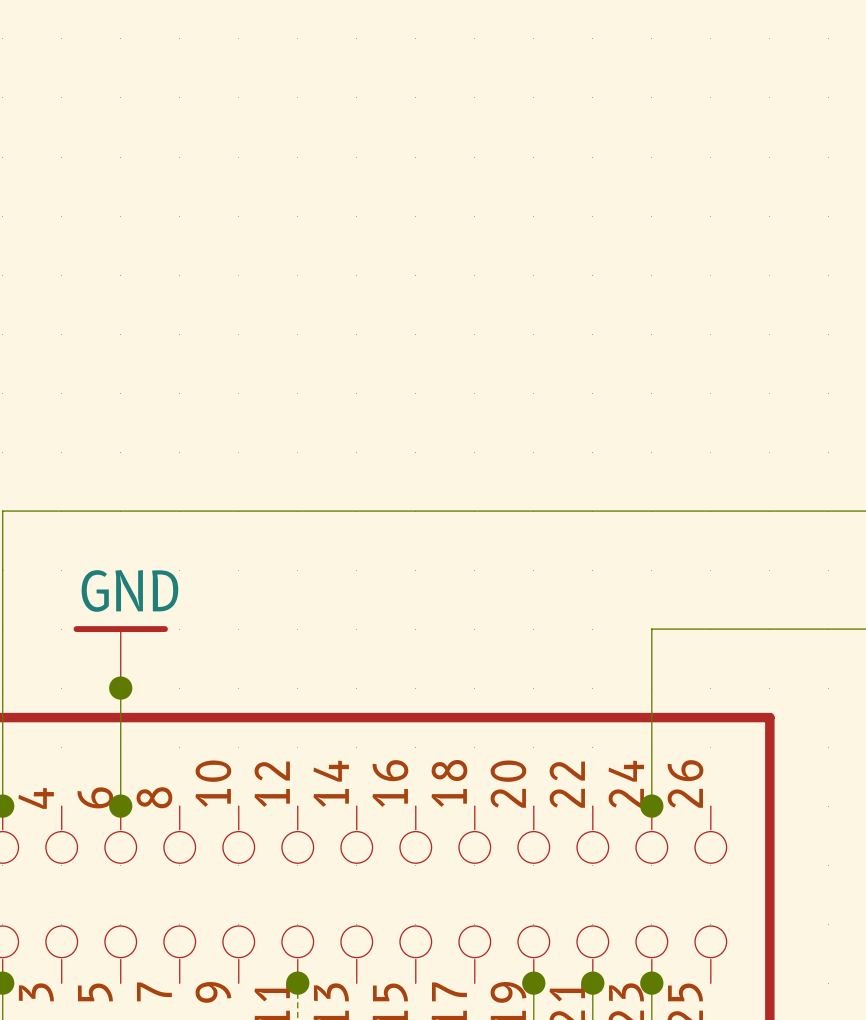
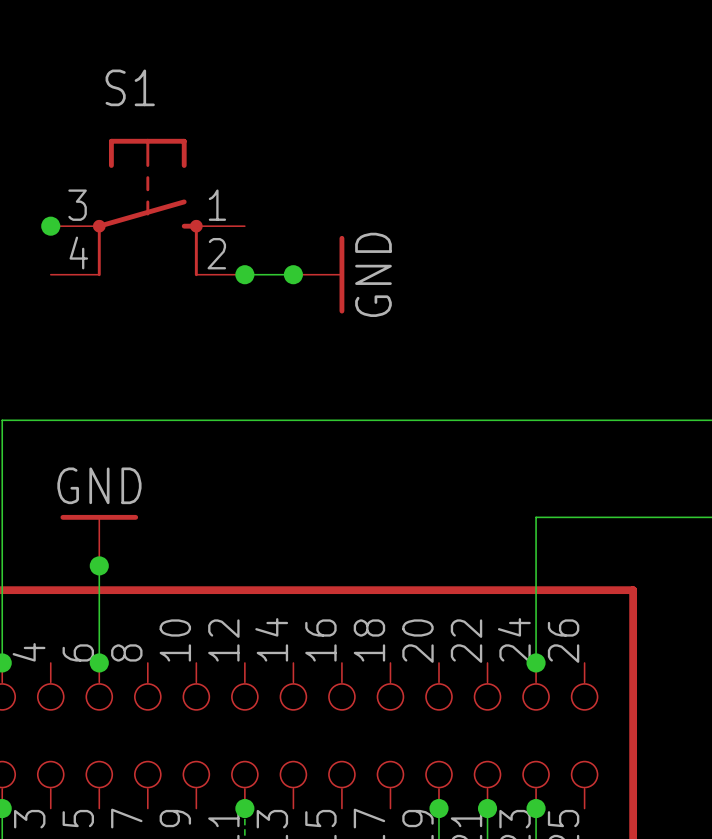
S1: none -> (147, 207)
junction: none -> (50, 226)
wire: none -> (244, 274) (293, 274)
junction: none -> (244, 274)
junction: none -> (293, 274)
power symbol: none -> GND (318, 274)

